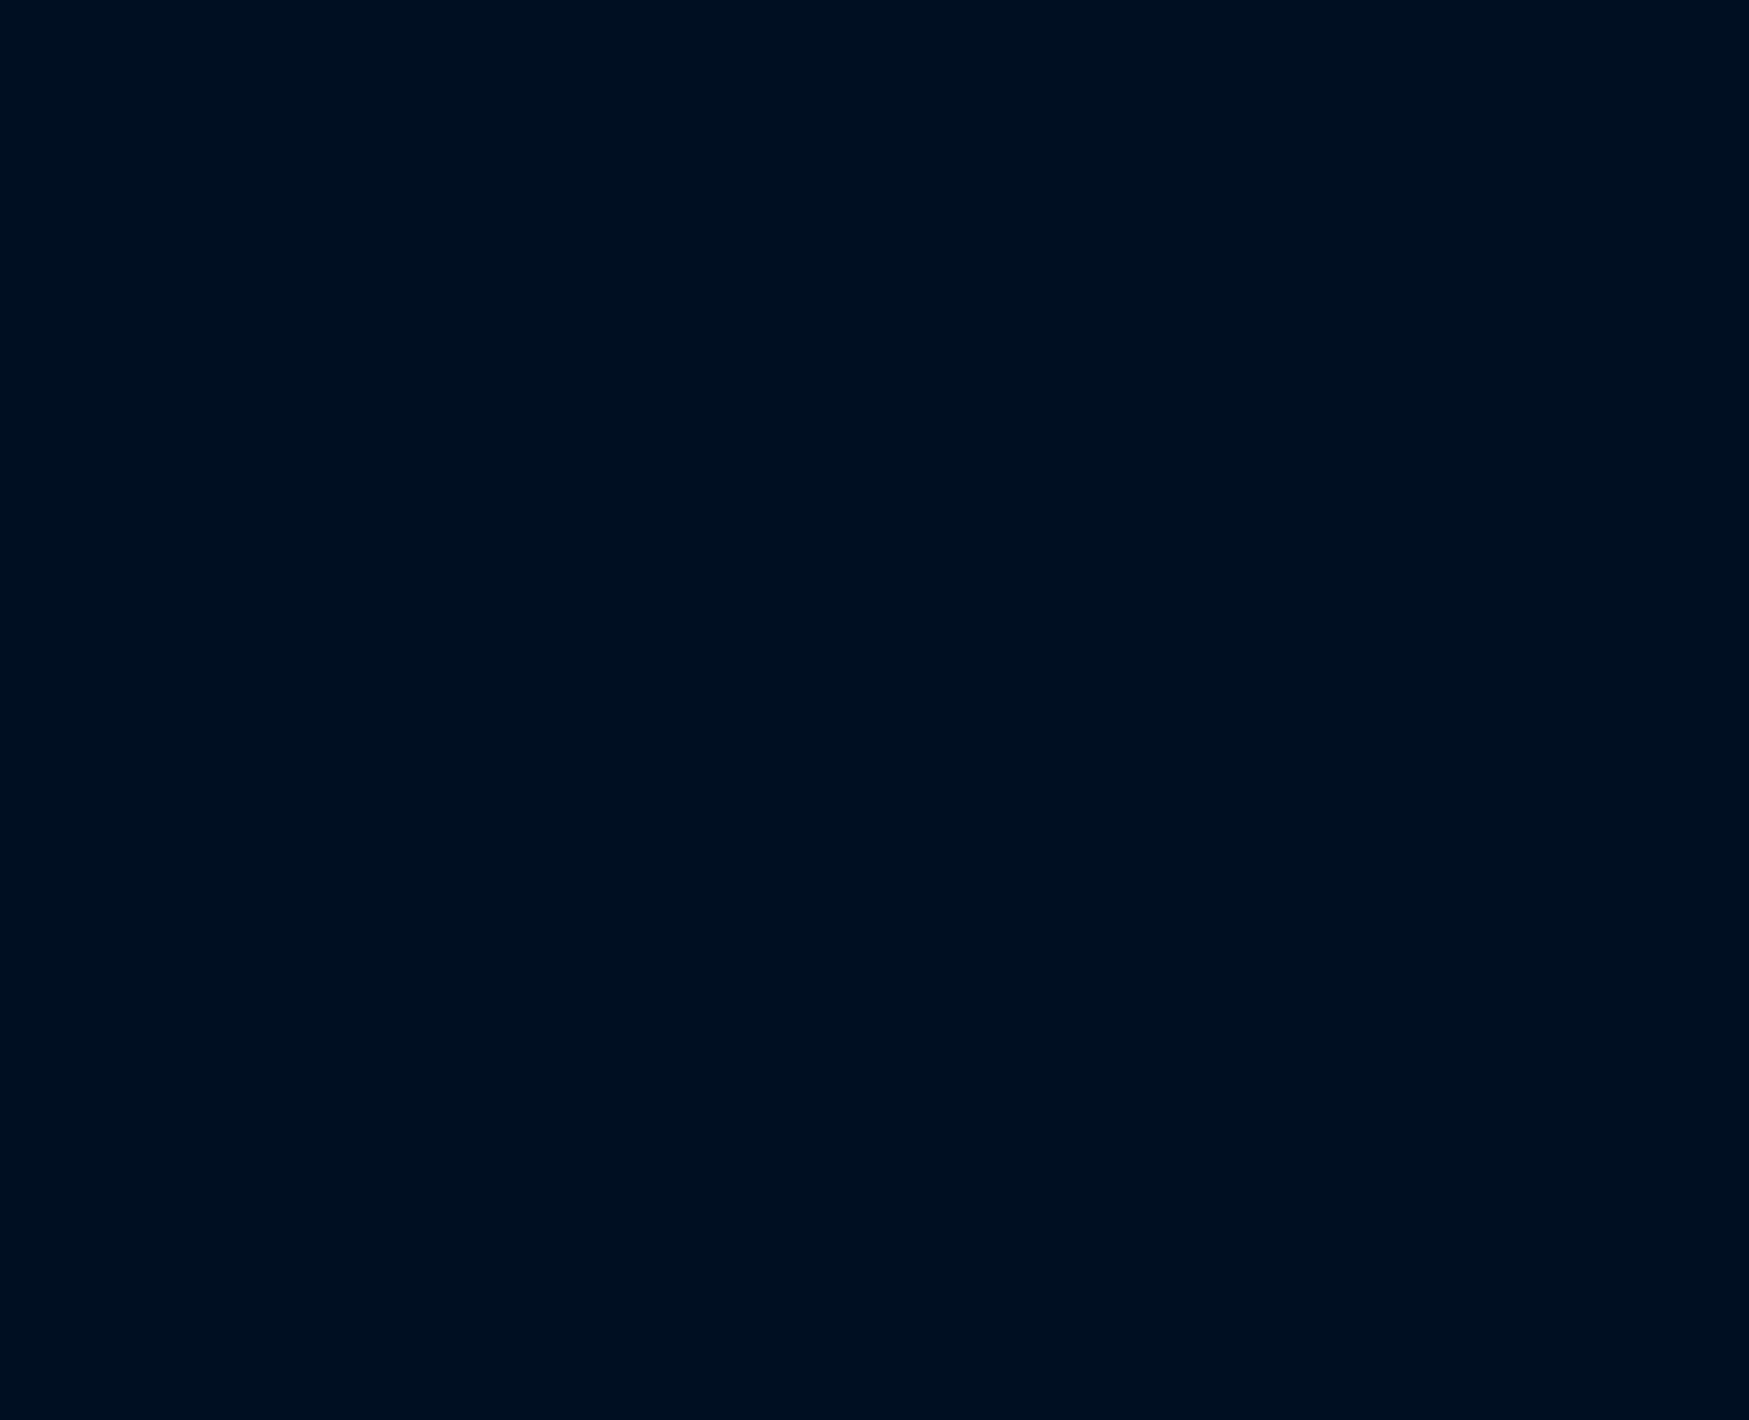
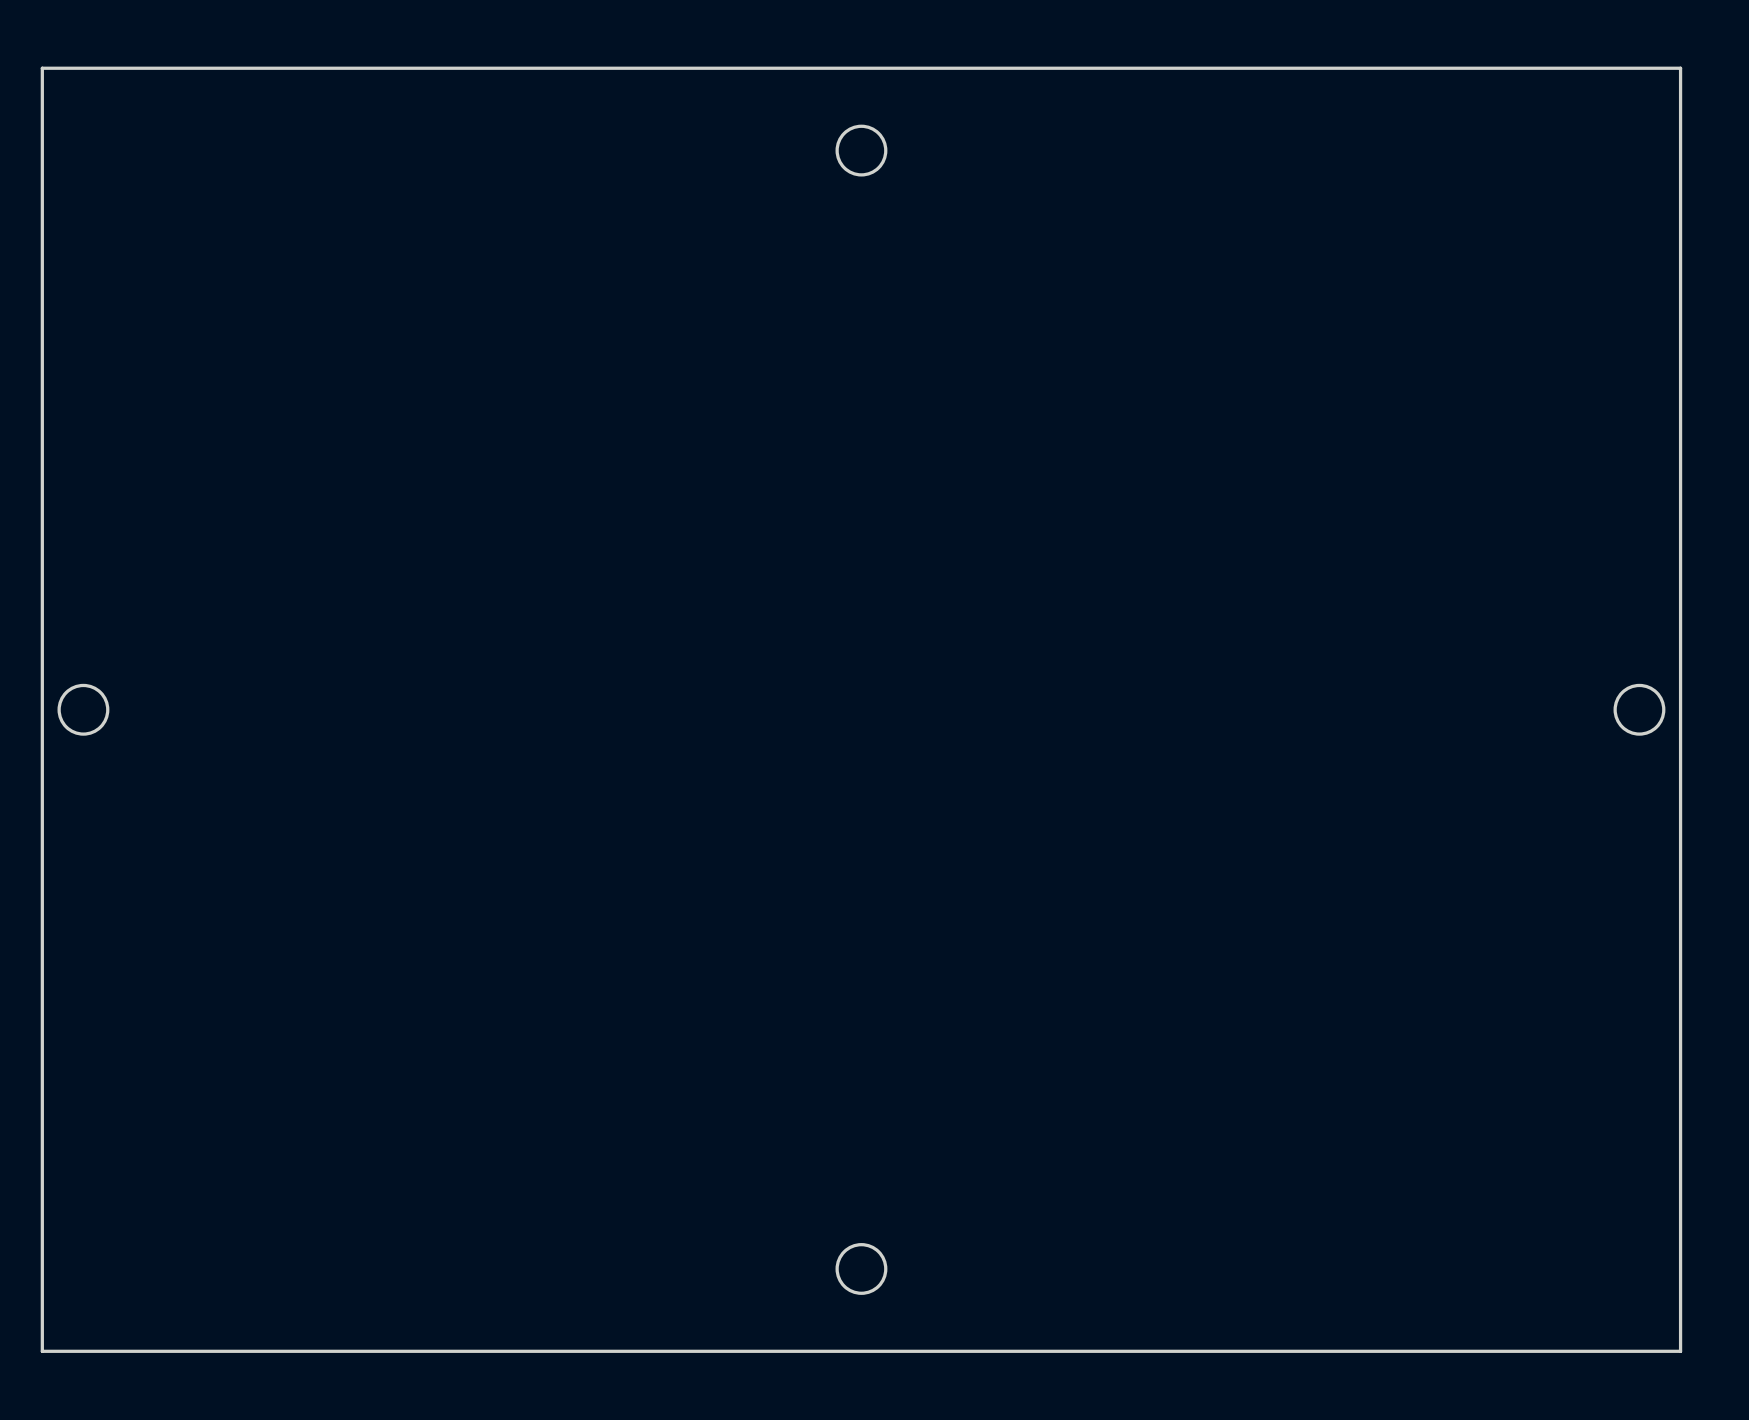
board edge: none -> (42, 68) (1680, 68) (1680, 1351) (42, 1351) (42, 68)
round board edge: none -> [835, 124, 888, 177]
round board edge: none -> [57, 683, 110, 736]
round board edge: none -> [1613, 683, 1666, 736]
round board edge: none -> [835, 1243, 888, 1295]

